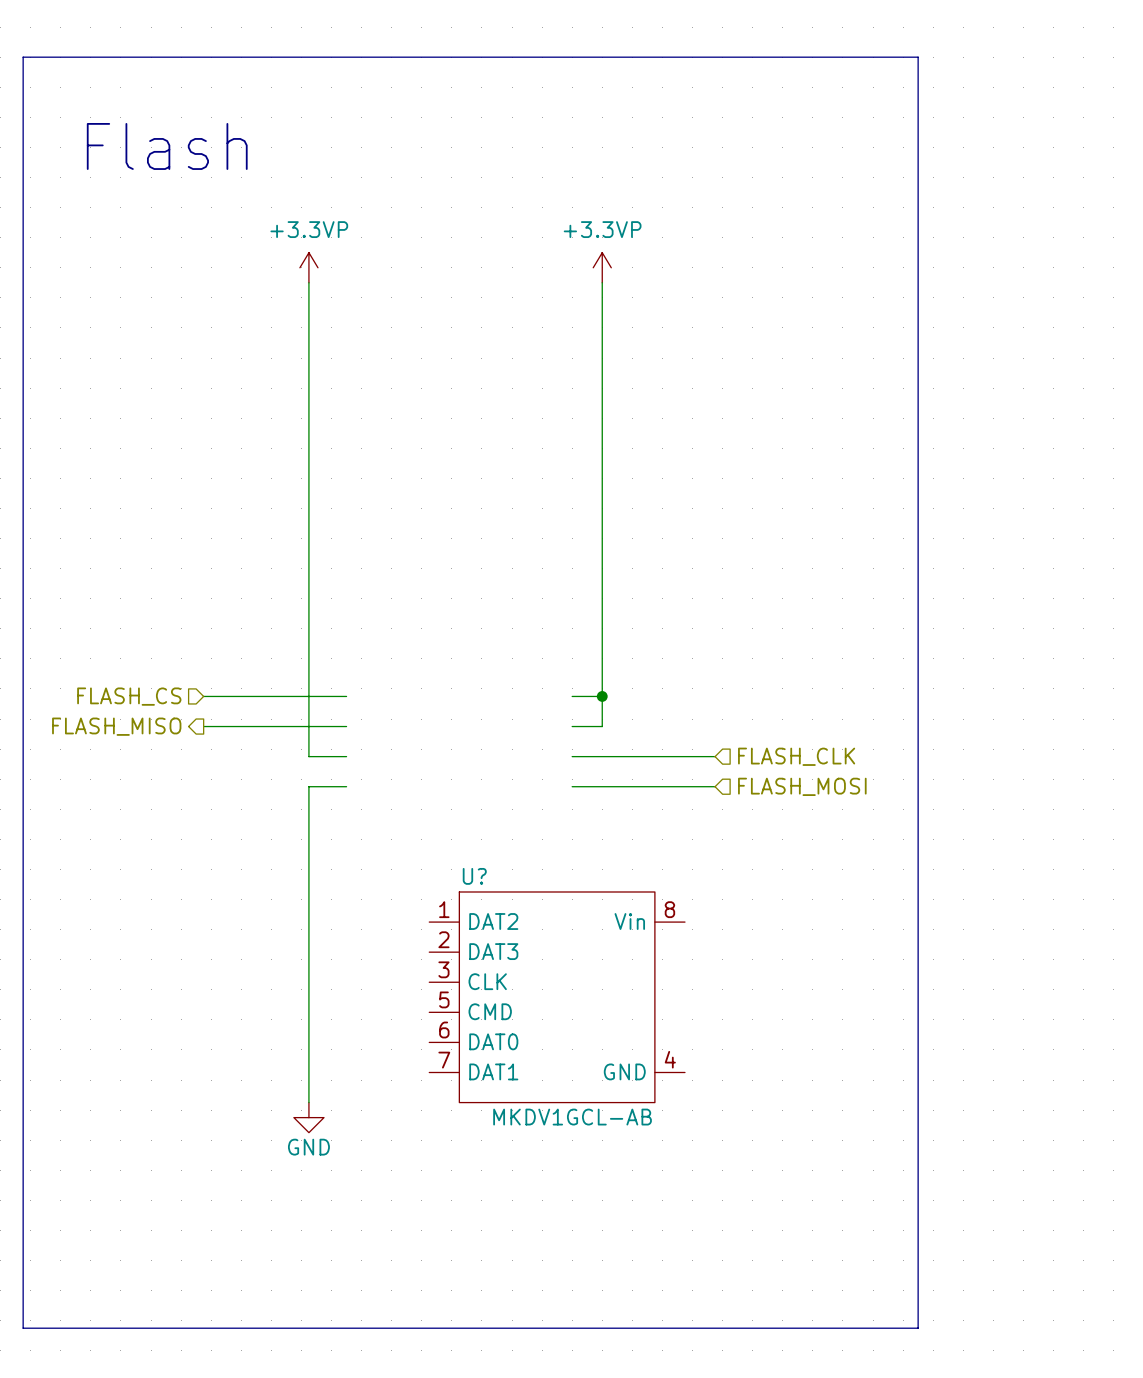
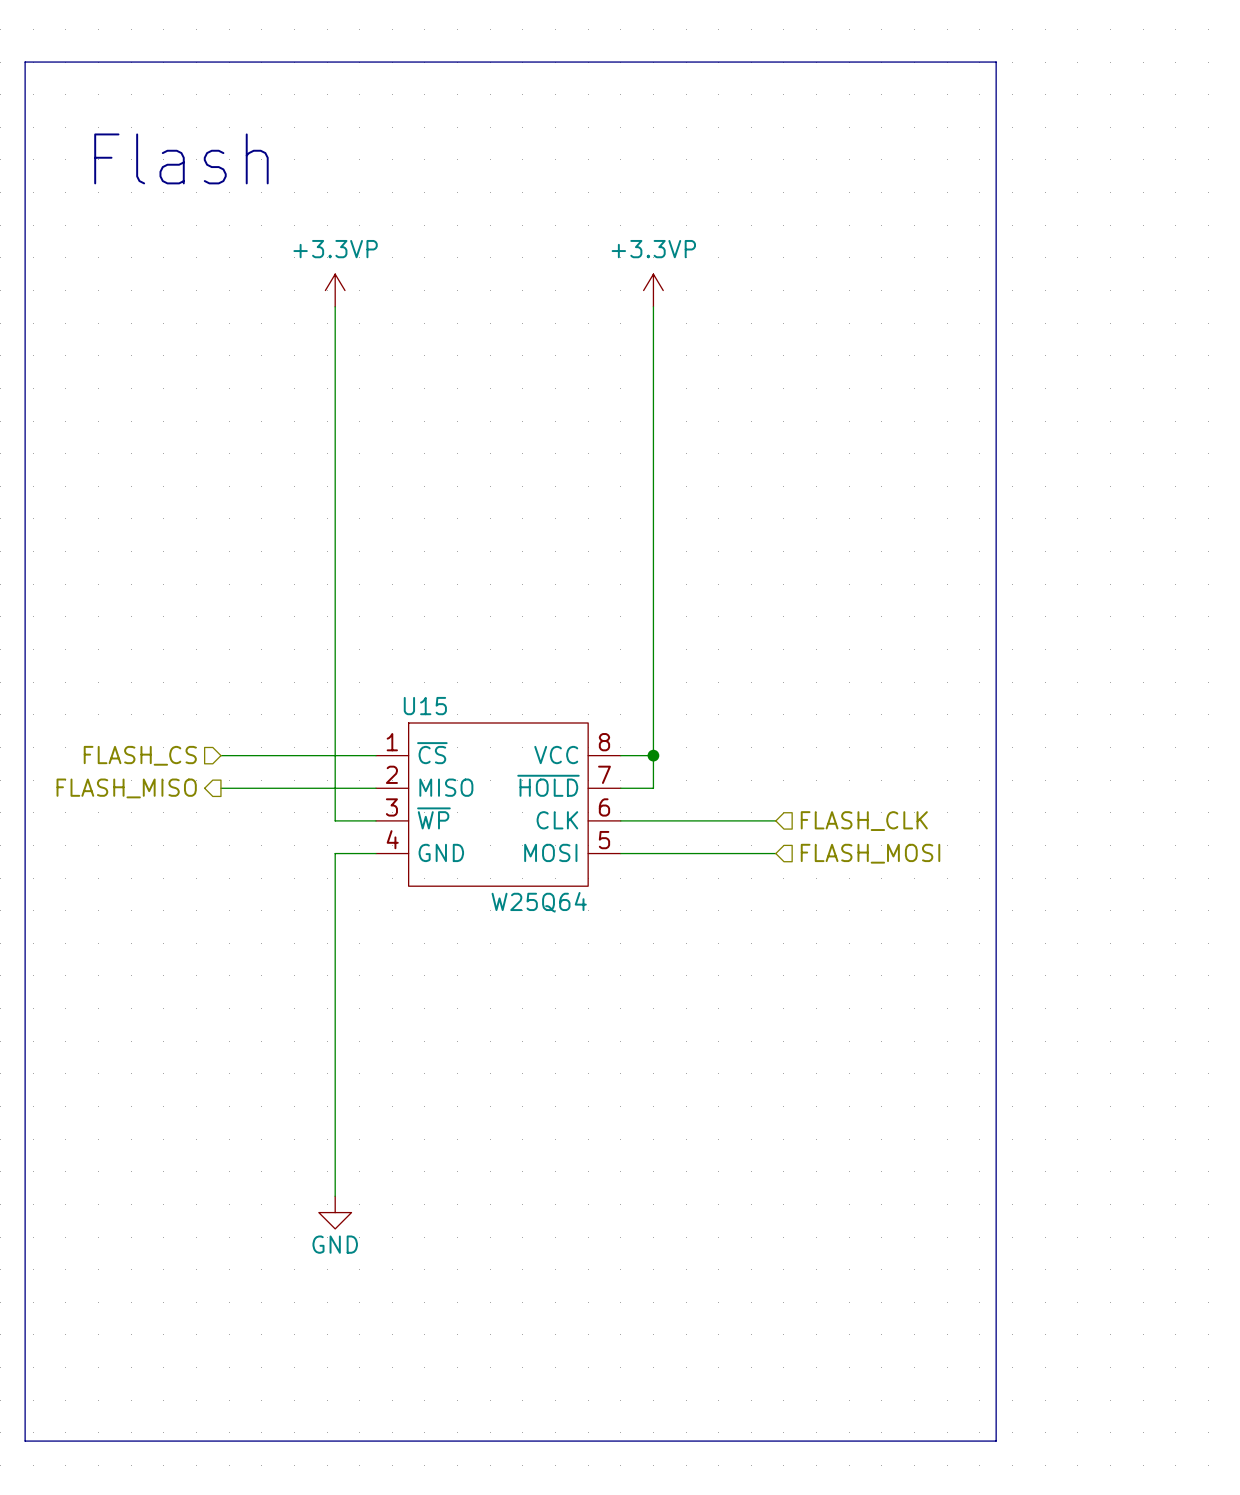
U15: none -> W25Q64 (498, 804)
U?: MKDV1GCL-AB (557, 997) -> none

